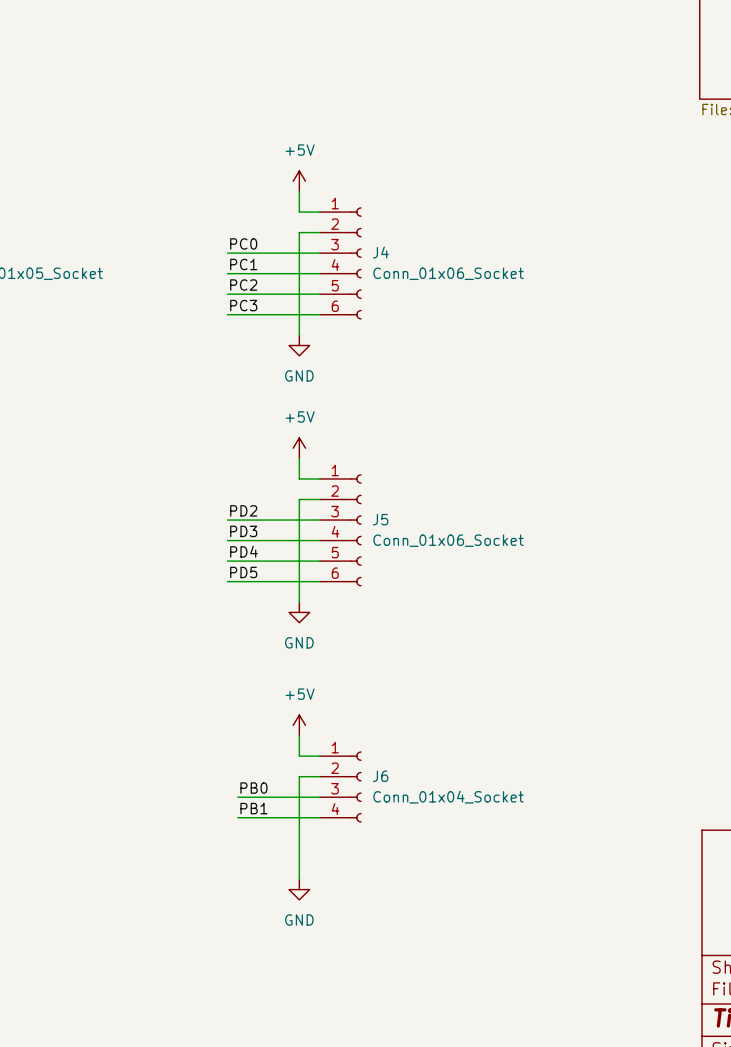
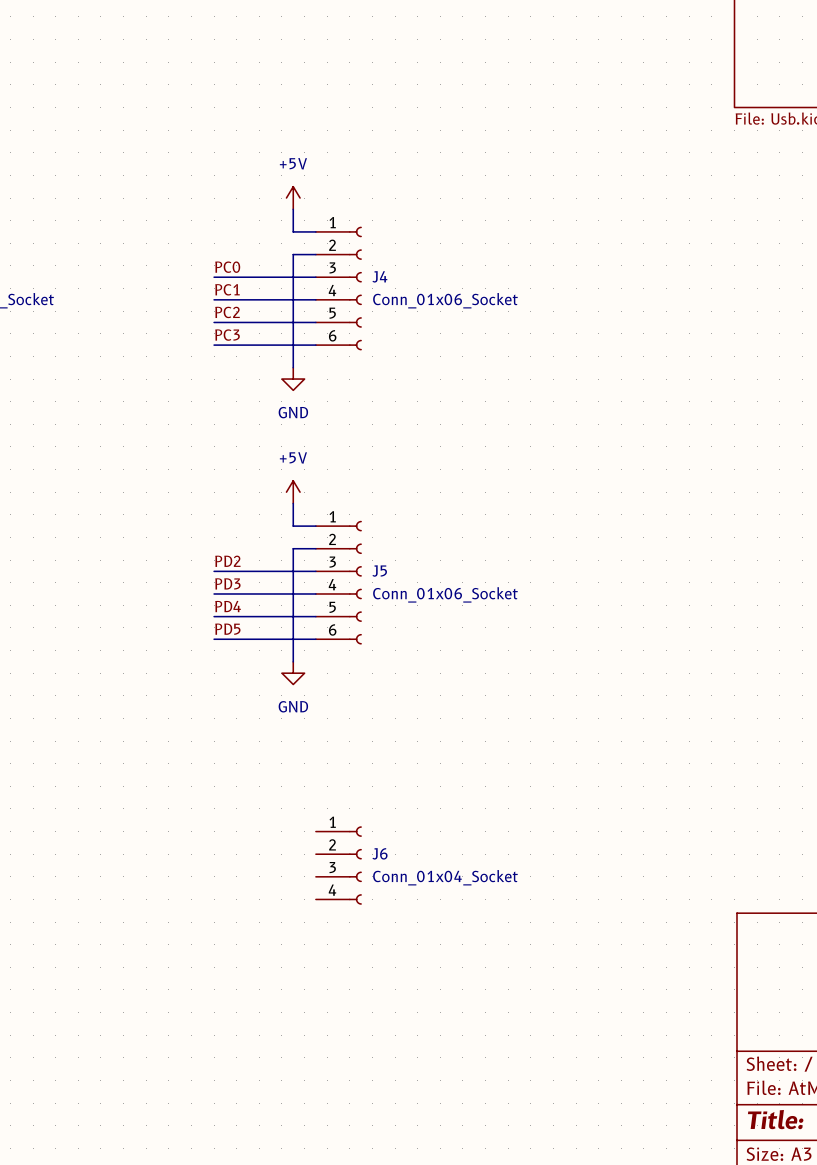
power symbol: +5V (299, 725) -> none
wire: (299, 735) (299, 756) (319, 756) -> none
wire: (319, 776) (299, 776) (299, 879) -> none
label: PB0 (253, 788) -> none
wire: (237, 797) (319, 797) -> none
label: PB1 (253, 808) -> none
wire: (237, 817) (319, 817) -> none
power symbol: GND (299, 889) -> none

